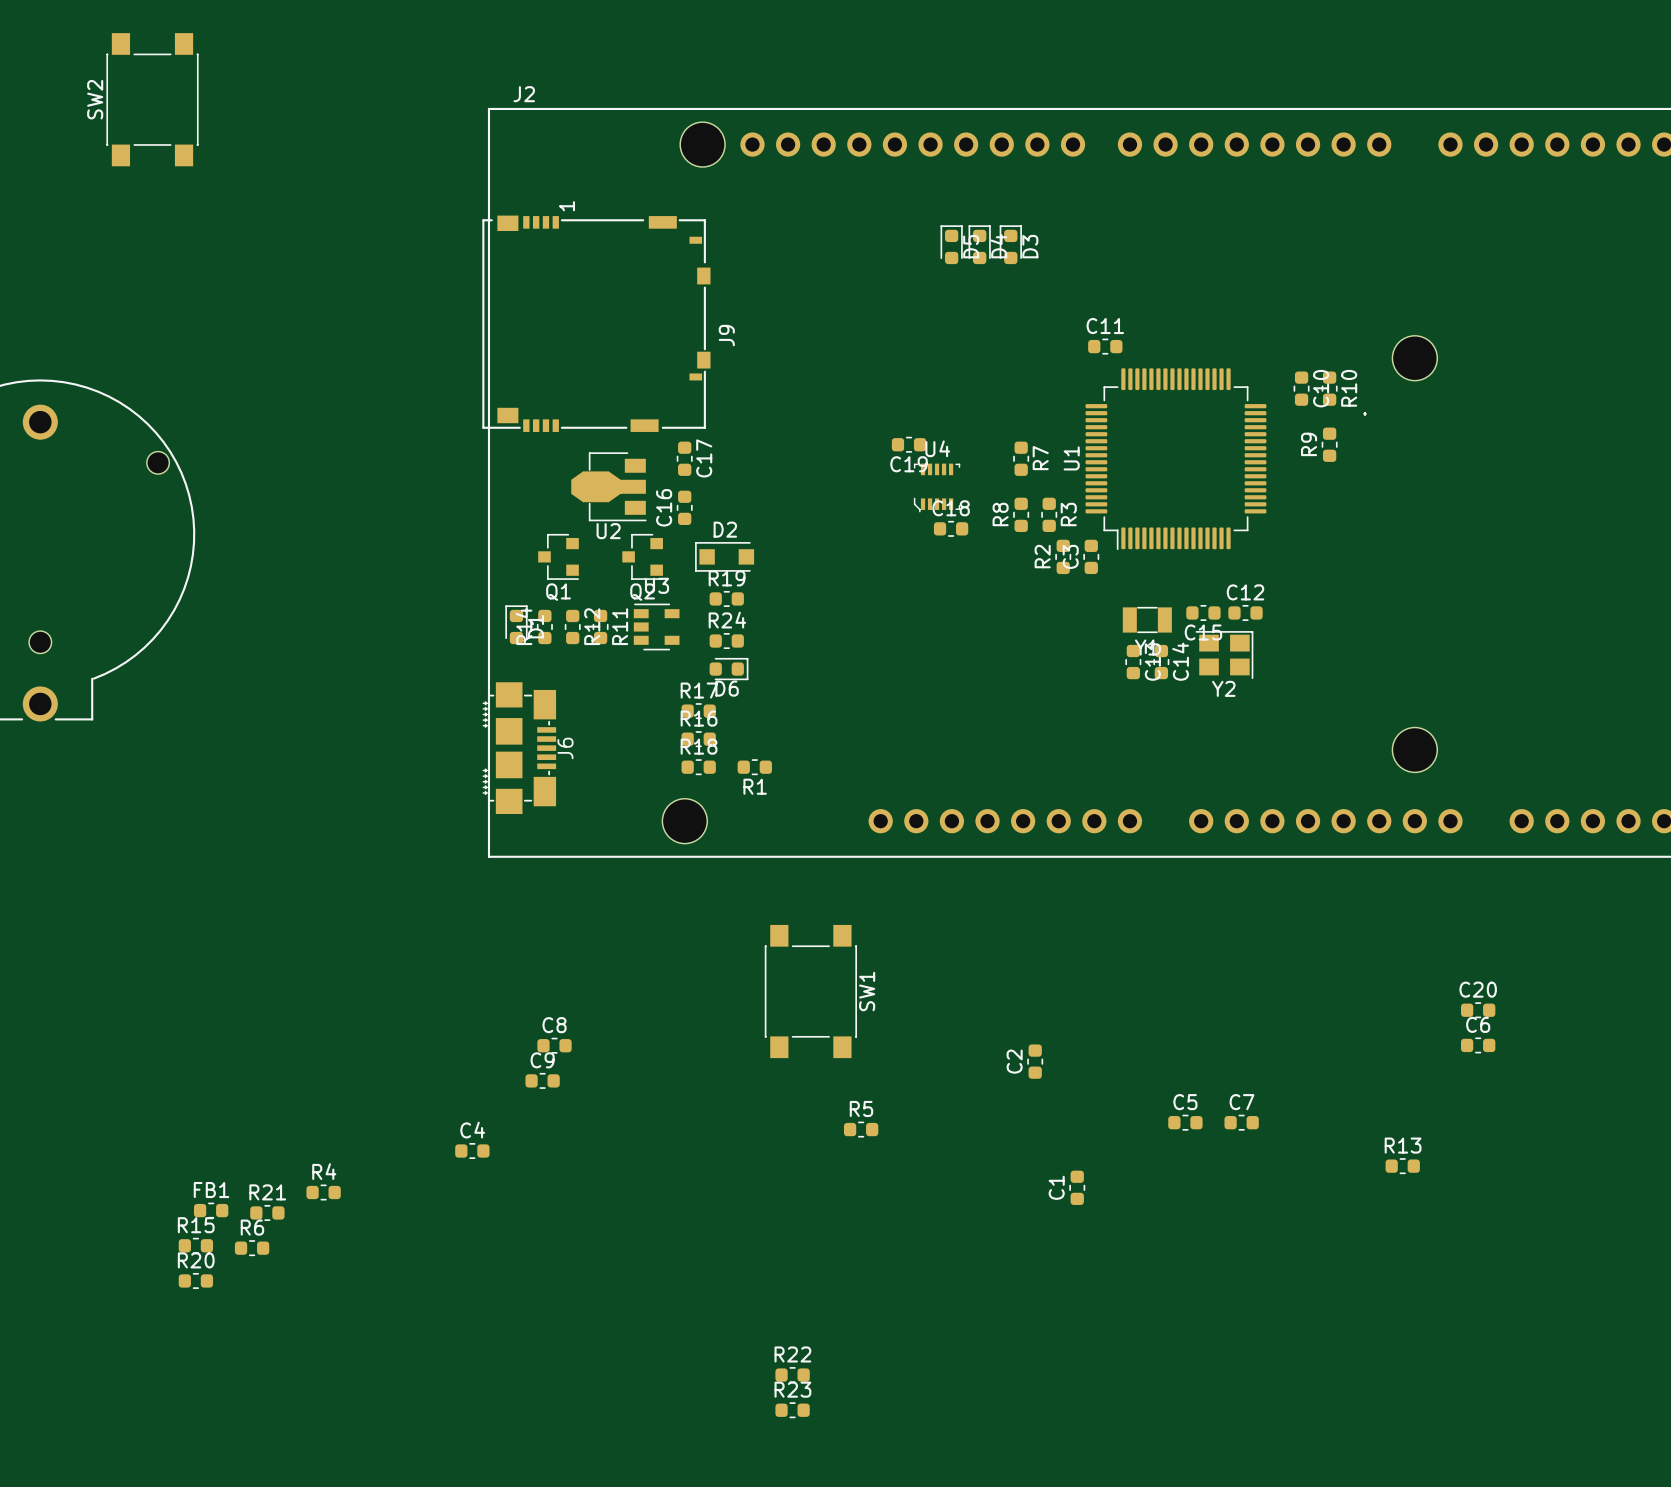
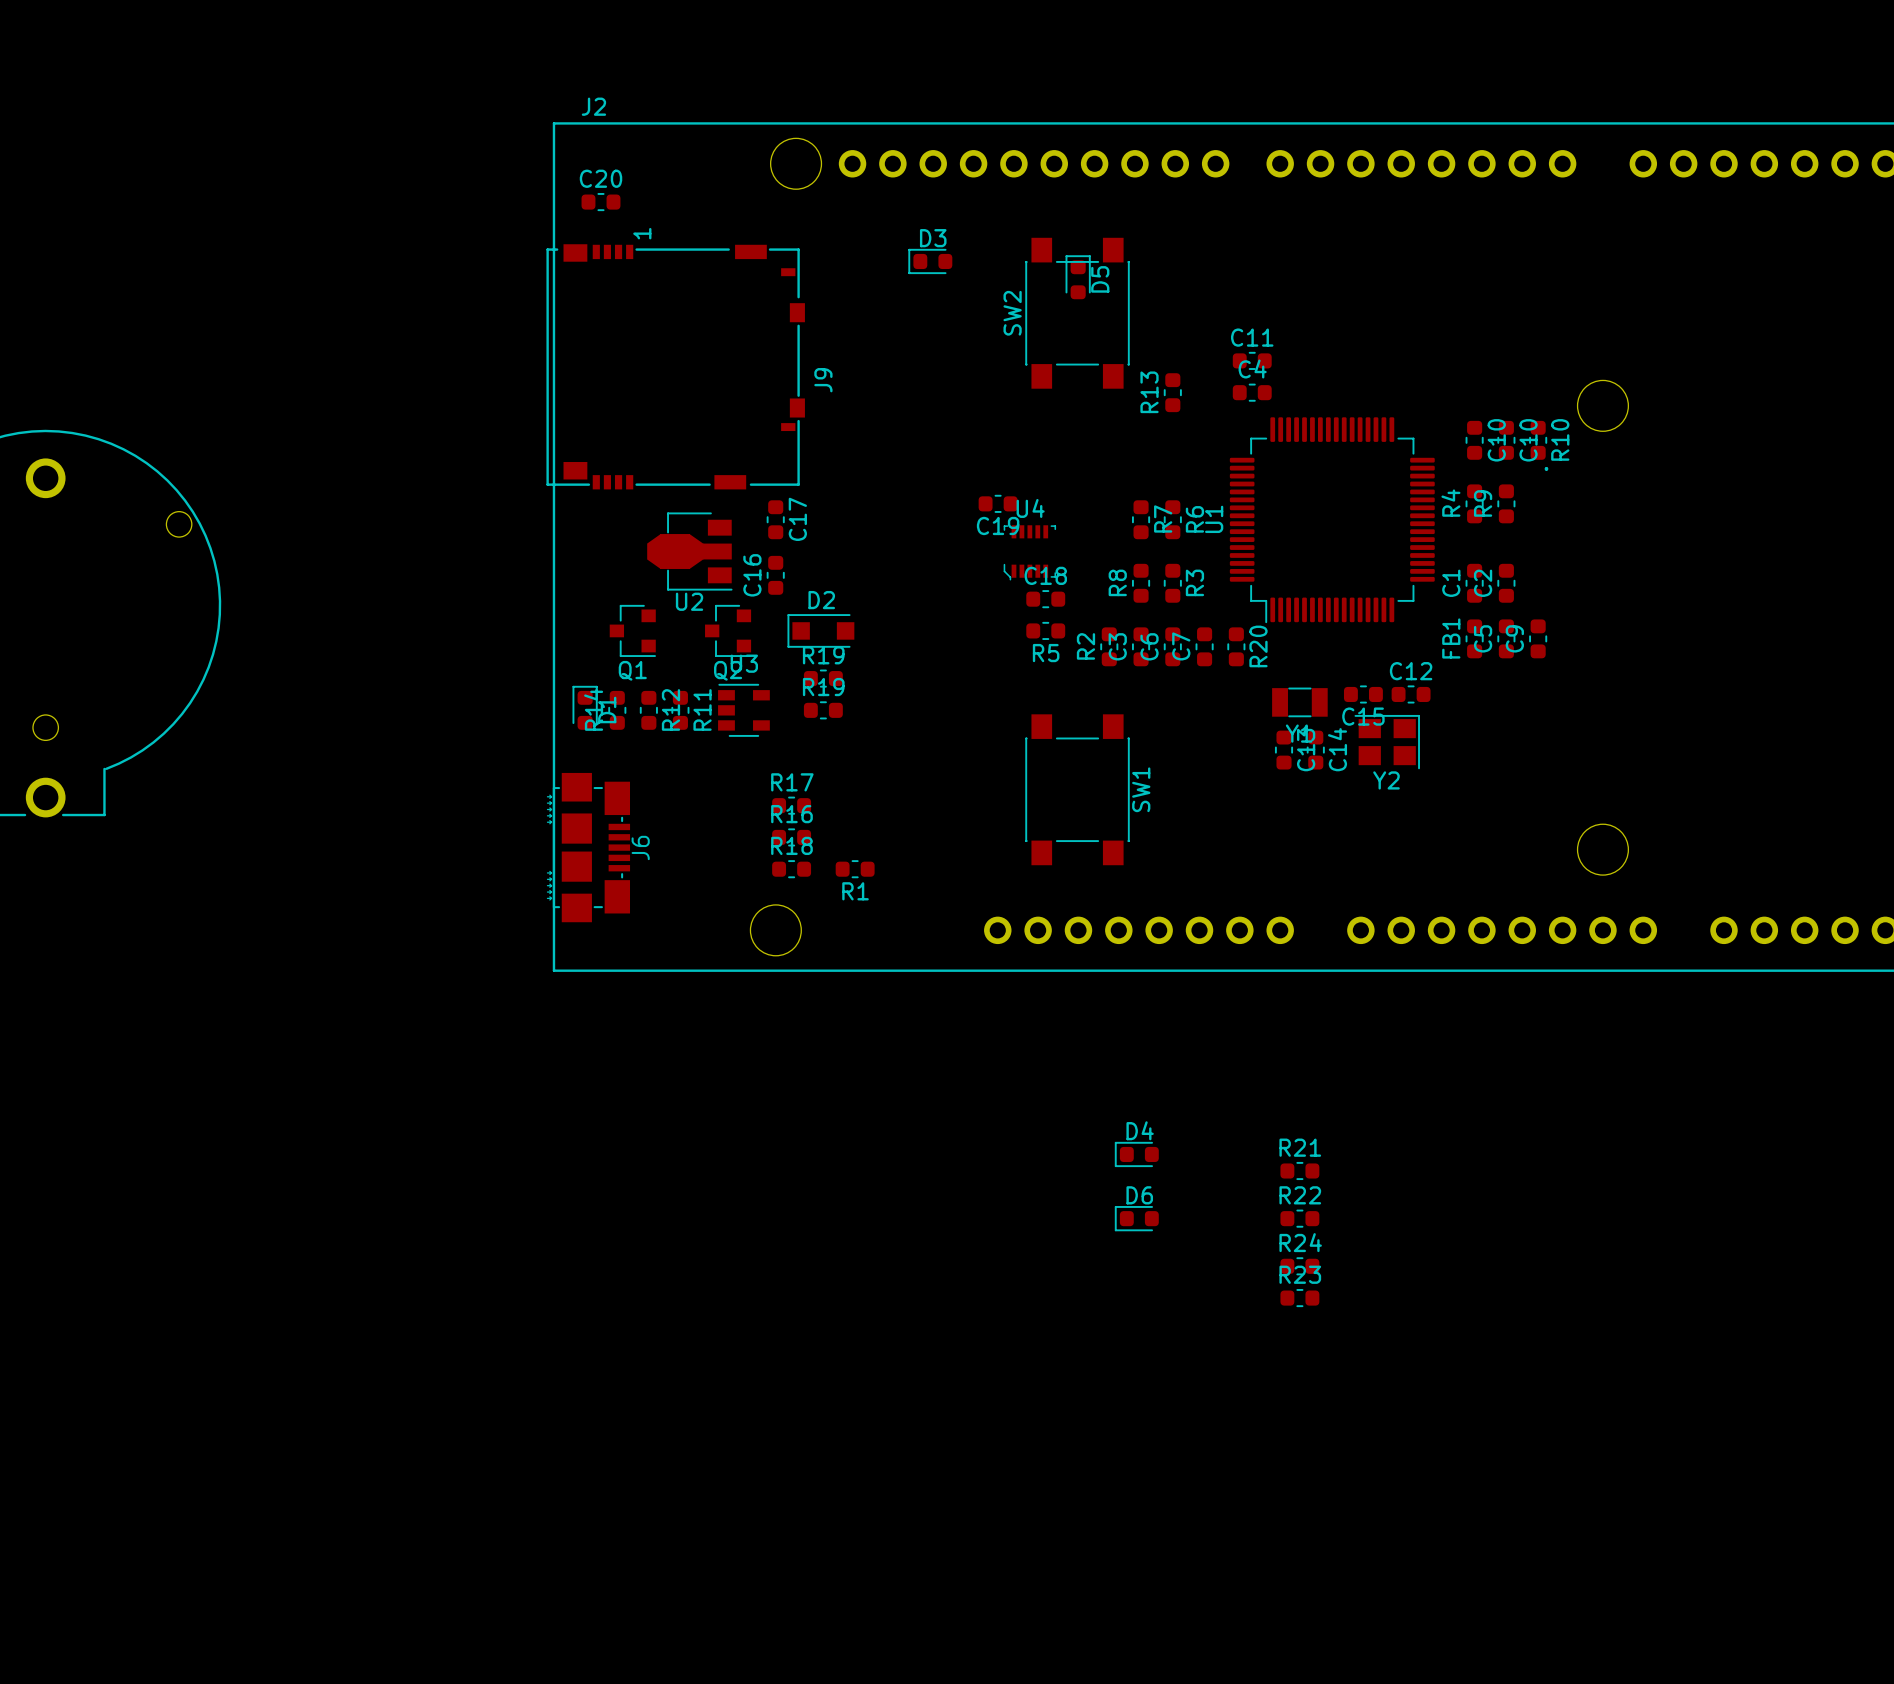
SW2 position: (152, 99) -> (1077, 313)
D4 rotation: 0° (979, 244) -> 90° counterclockwise (1136, 1154)
D4 position: (979, 244) -> (1136, 1154)
D3 rotation: 0° (1010, 244) -> 90° counterclockwise (930, 261)
D3 position: (1010, 244) -> (930, 261)
C11: none -> (1252, 360)
C11 name: C11 (1105, 326) -> C4 (1252, 368)
R10 name: R10 (1349, 388) -> C10 (1528, 440)
R10: none -> (1538, 440)
C19 position: (909, 444) -> (998, 503)
R7 position: (1021, 458) -> (1141, 519)
U4 position: (937, 488) -> (1029, 552)
R8 position: (1021, 514) -> (1141, 583)
R3 position: (1049, 514) -> (1172, 583)
C18 position: (951, 528) -> (1045, 599)
R2 position: (1063, 556) -> (1109, 646)
C3 position: (1091, 556) -> (1141, 646)
R19: none -> (823, 710)
R24 position: (726, 641) -> (1299, 1266)
D6 rotation: 0° (729, 669) -> 180° (1136, 1218)
D6 position: (729, 669) -> (1136, 1218)
SW1 position: (810, 991) -> (1077, 789)
C20 position: (1478, 1010) -> (600, 202)
C6 name position: C6 (1478, 1024) -> C6 (1149, 646)
C8: (554, 1045) -> none
C6 rotation: 0° (1478, 1045) -> 90° clockwise (1172, 646)
C6 position: (1478, 1045) -> (1172, 646)
C9 name position: C9 (542, 1060) -> C9 (1514, 638)
C2 position: (1035, 1061) -> (1506, 583)
C9 rotation: 0° (542, 1080) -> 90° clockwise (1538, 638)
C9 position: (542, 1080) -> (1538, 638)
C5 name position: C5 (1185, 1102) -> C5 (1483, 638)
C7 name position: C7 (1241, 1102) -> C7 (1181, 646)
R5 name position: R5 (861, 1108) -> R5 (1046, 653)
C5 rotation: 0° (1185, 1122) -> 90° clockwise (1506, 638)
C5 position: (1185, 1122) -> (1506, 638)
C7 rotation: 0° (1241, 1122) -> 90° clockwise (1204, 646)
C7 position: (1241, 1122) -> (1204, 646)
R5 position: (861, 1129) -> (1045, 630)
R13 name position: R13 (1403, 1145) -> R13 (1149, 392)
C4: (472, 1151) -> none
R13 rotation: 0° (1402, 1166) -> 90° clockwise (1172, 392)
R13 position: (1402, 1166) -> (1172, 392)
R4 name position: R4 (324, 1171) -> R4 (1450, 503)
C1 position: (1077, 1187) -> (1474, 583)
FB1 name position: FB1 (211, 1190) -> FB1 (1451, 638)
R4 rotation: 0° (323, 1192) -> 90° clockwise (1474, 503)
R4 position: (323, 1192) -> (1474, 503)
FB1 rotation: 0° (211, 1210) -> 90° clockwise (1474, 638)
FB1 position: (211, 1210) -> (1474, 638)
R21 position: (267, 1212) -> (1299, 1170)
R15: (195, 1245) -> none
R6 rotation: 0° (252, 1248) -> 90° clockwise (1172, 519)
R6 position: (252, 1248) -> (1172, 519)
R20 rotation: 0° (195, 1280) -> 90° clockwise (1236, 646)
R20 position: (195, 1280) -> (1236, 646)
R22 position: (792, 1375) -> (1299, 1218)
R23 position: (792, 1410) -> (1299, 1298)

